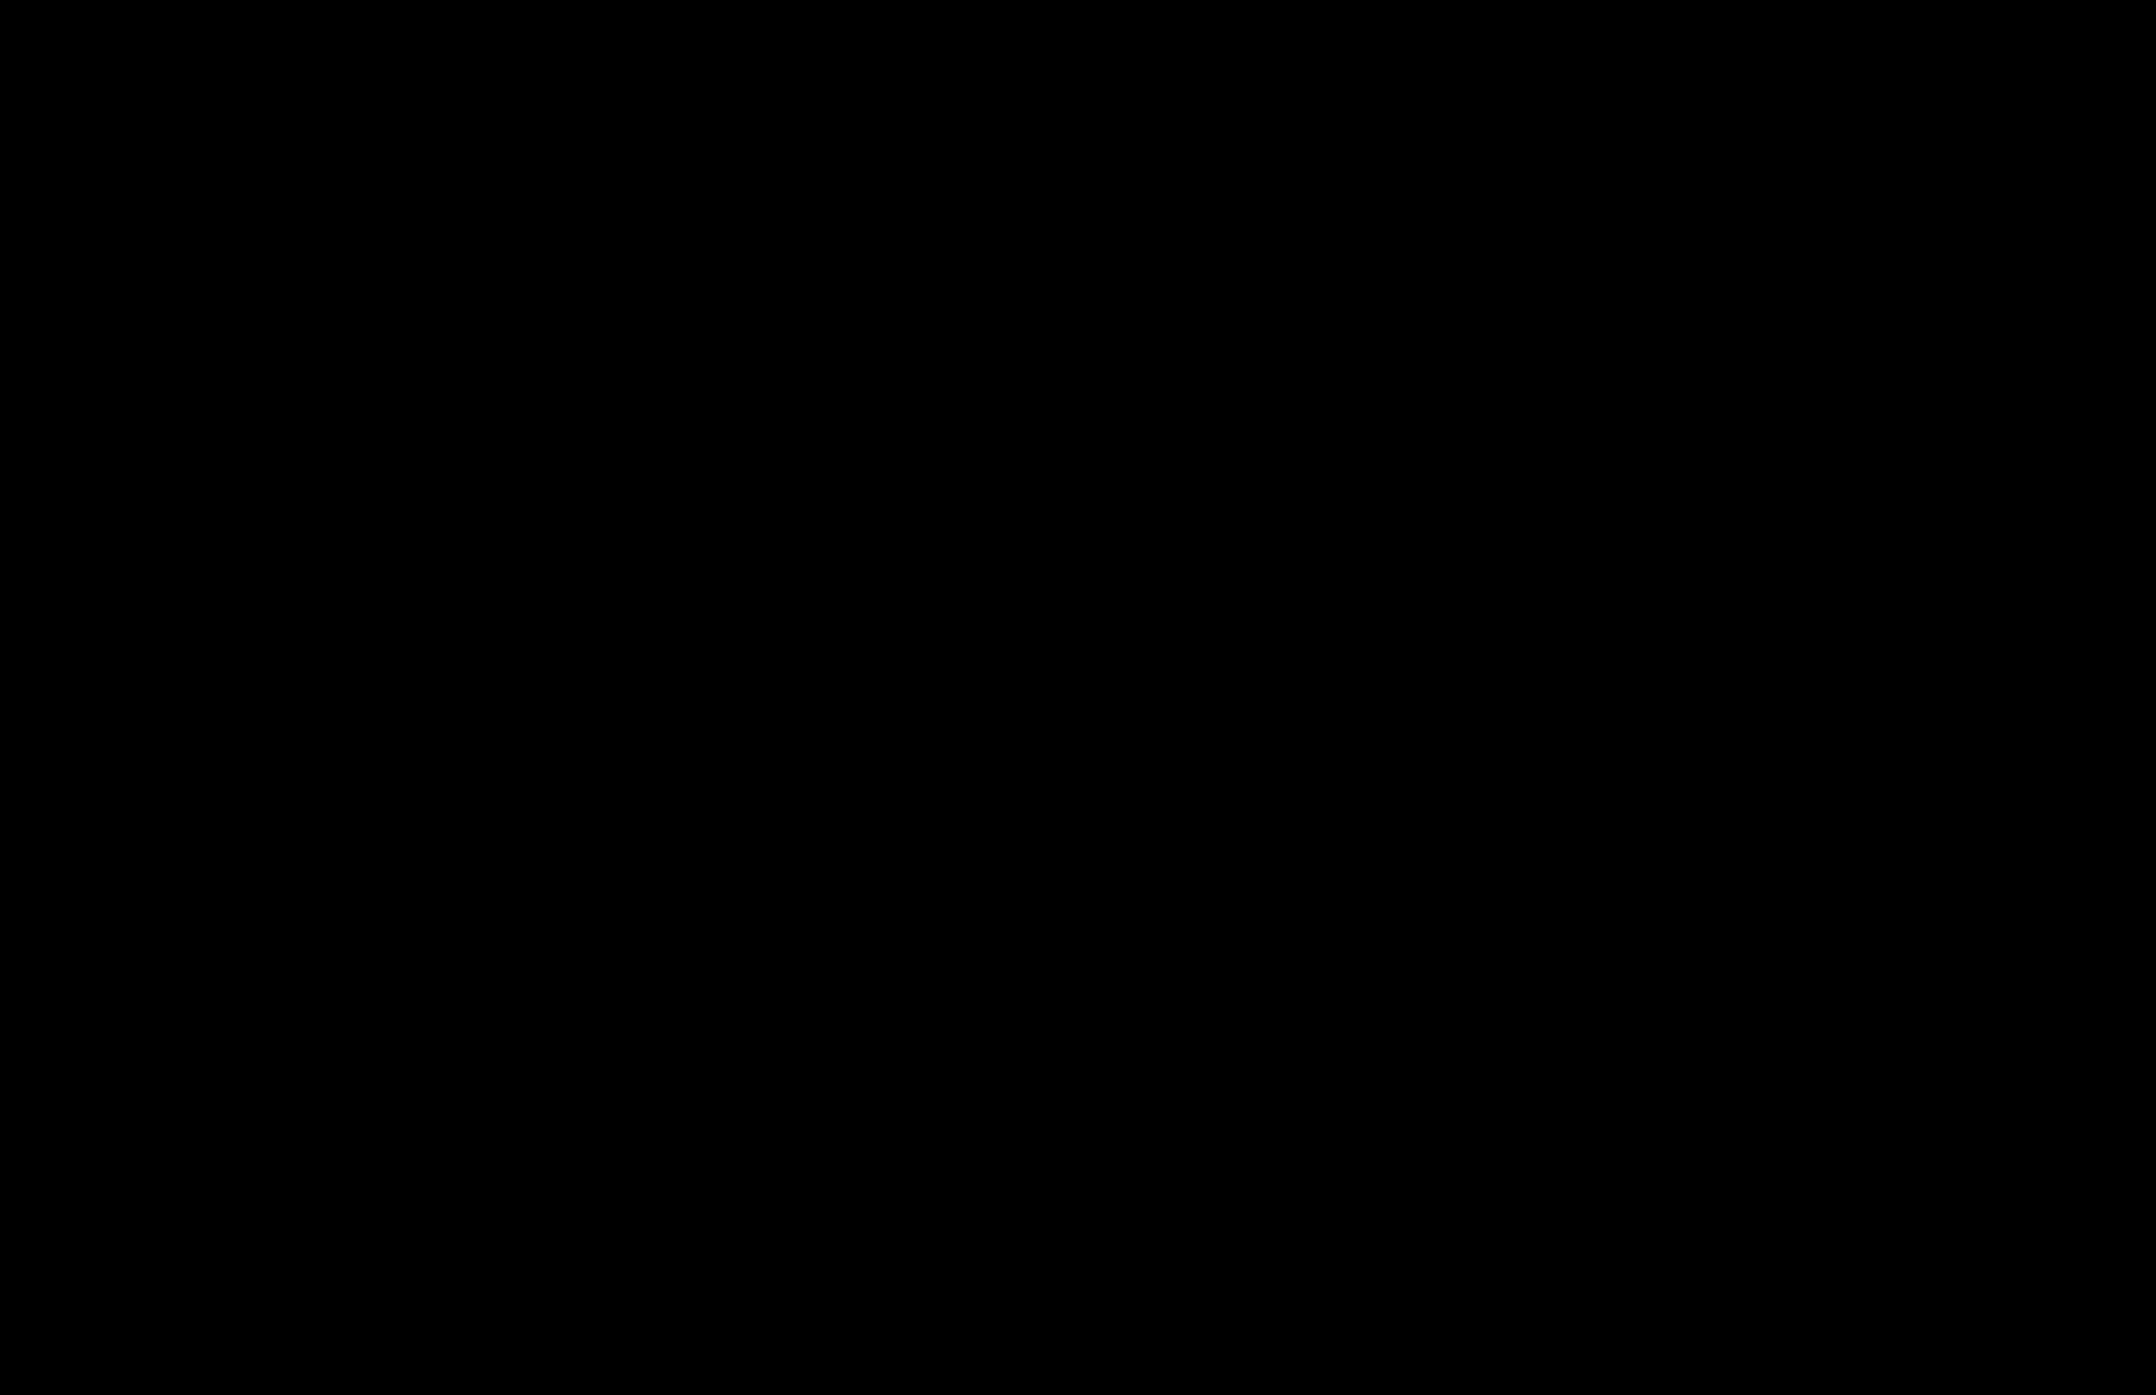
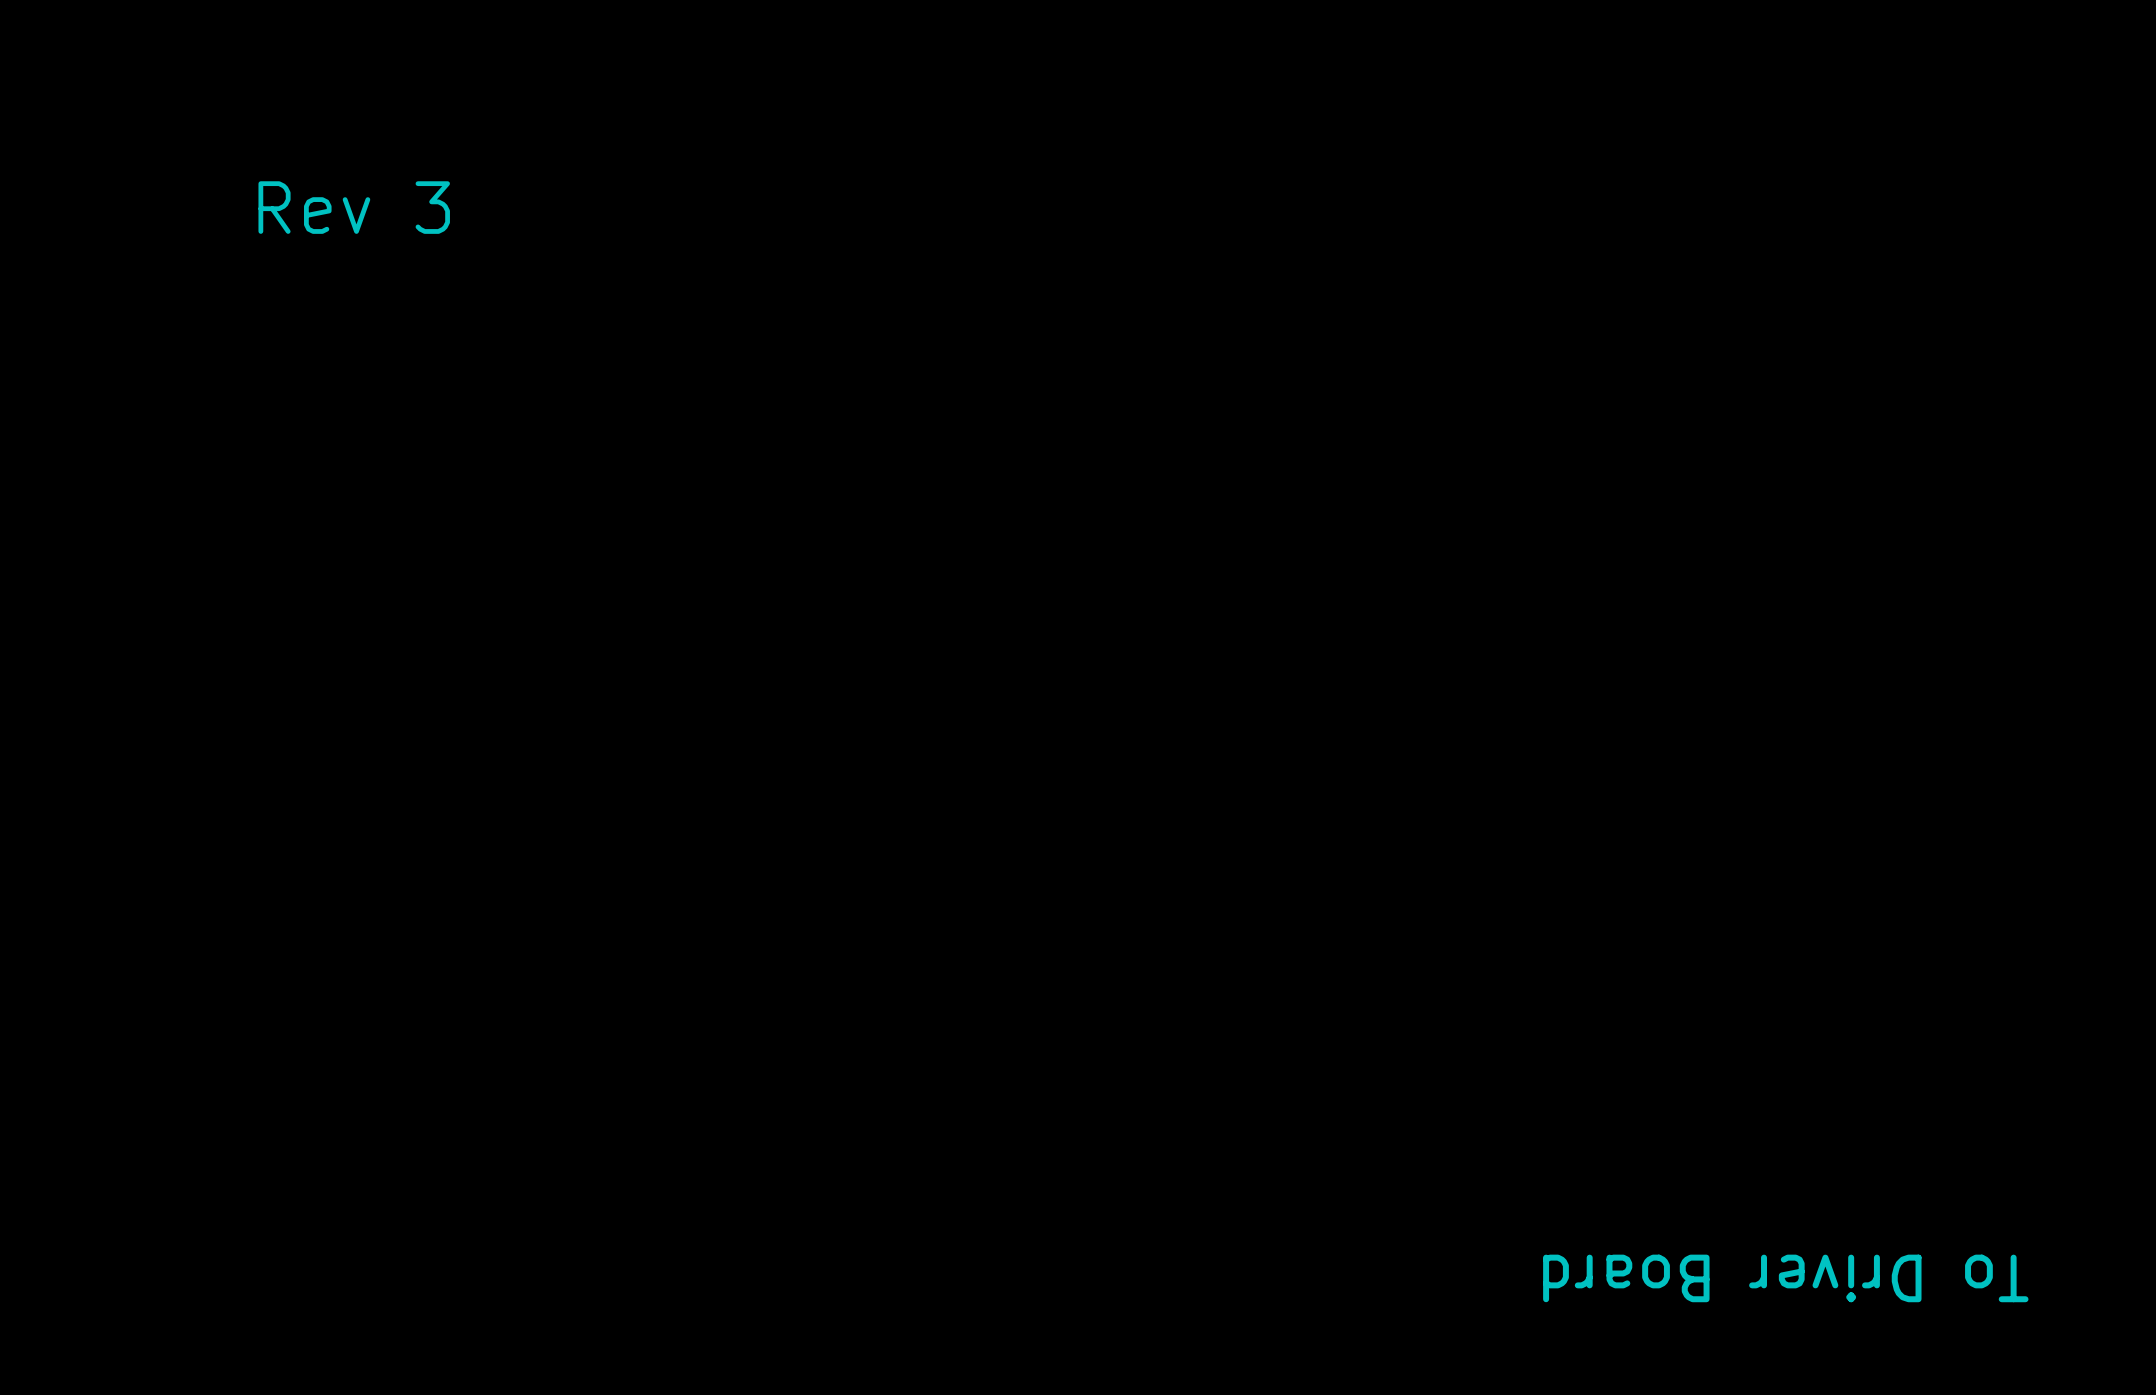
text: none -> Rev 3 (354, 207)
text: none -> To Driver Board (1785, 1278)

